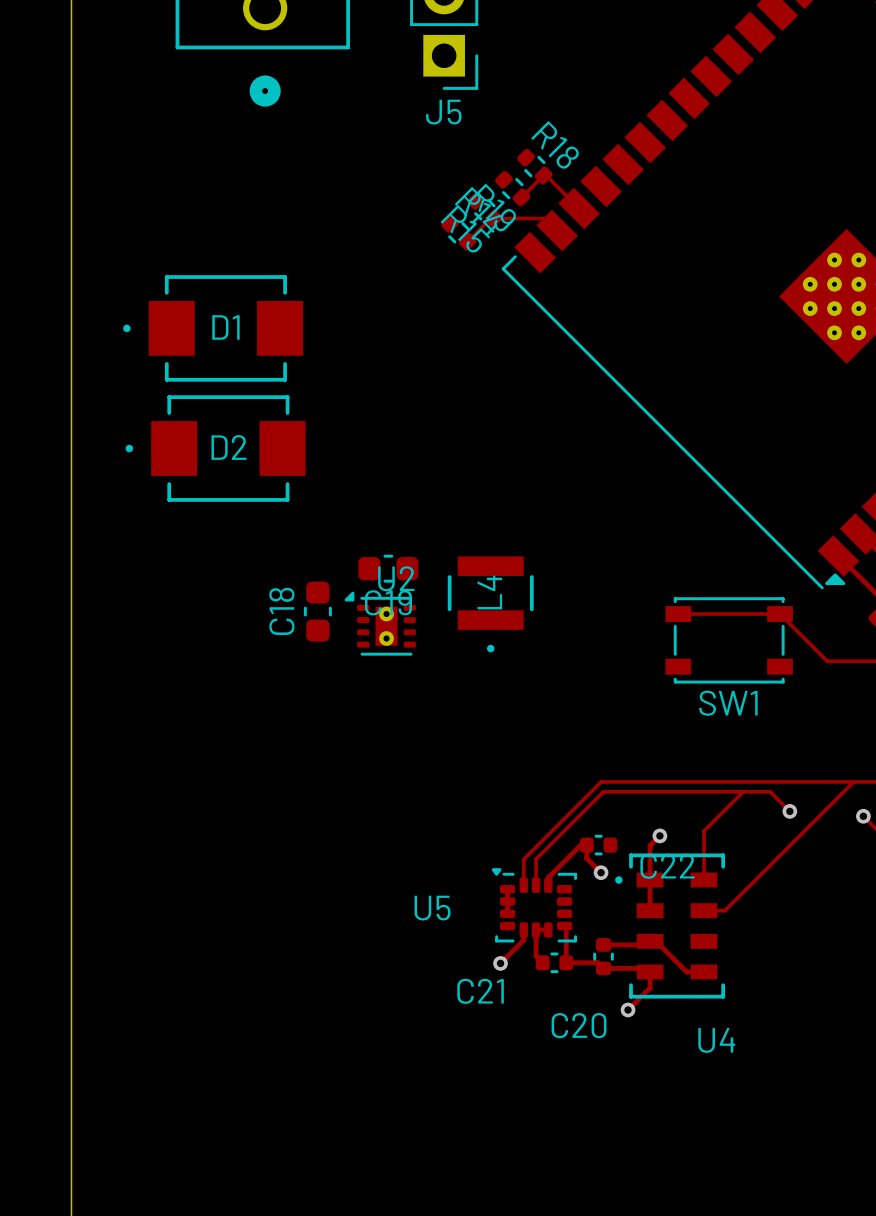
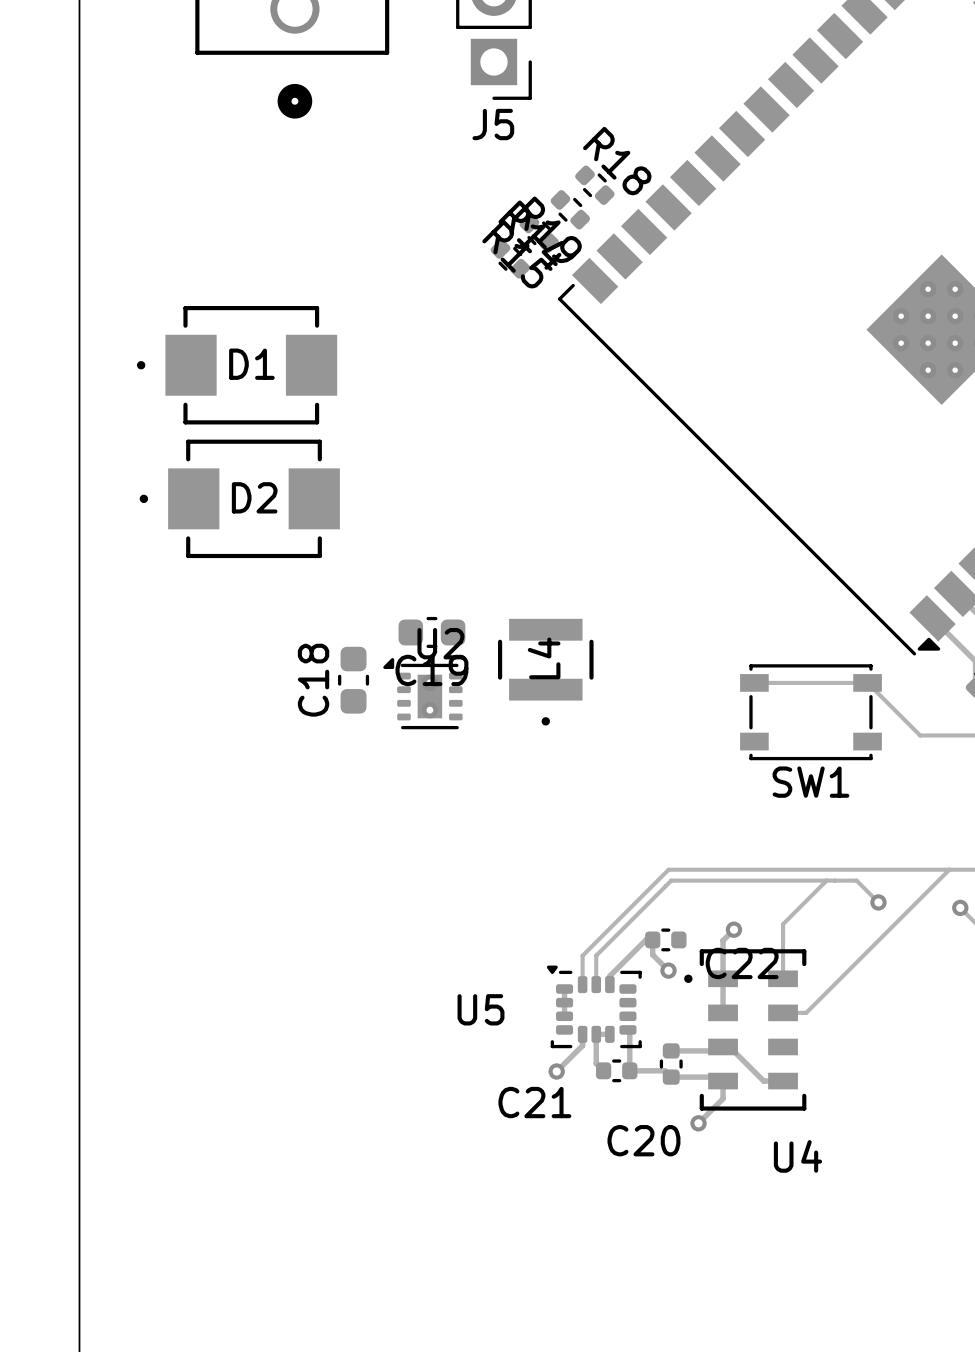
track: (521, 197) (543, 175) (546, 175) (579, 208) -> none
track: (557, 230) (545, 218) (490, 218) (467, 241) -> none

